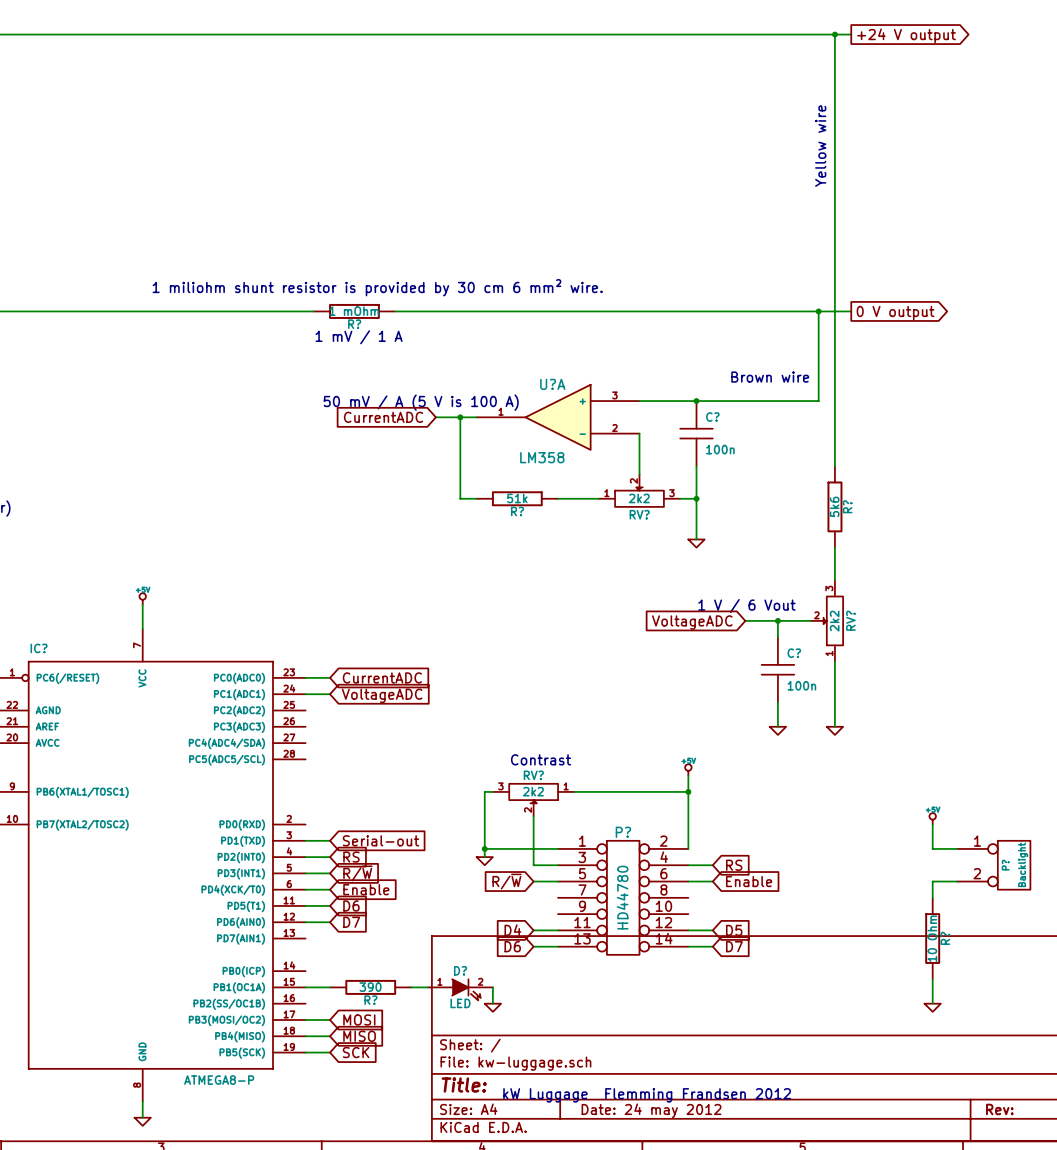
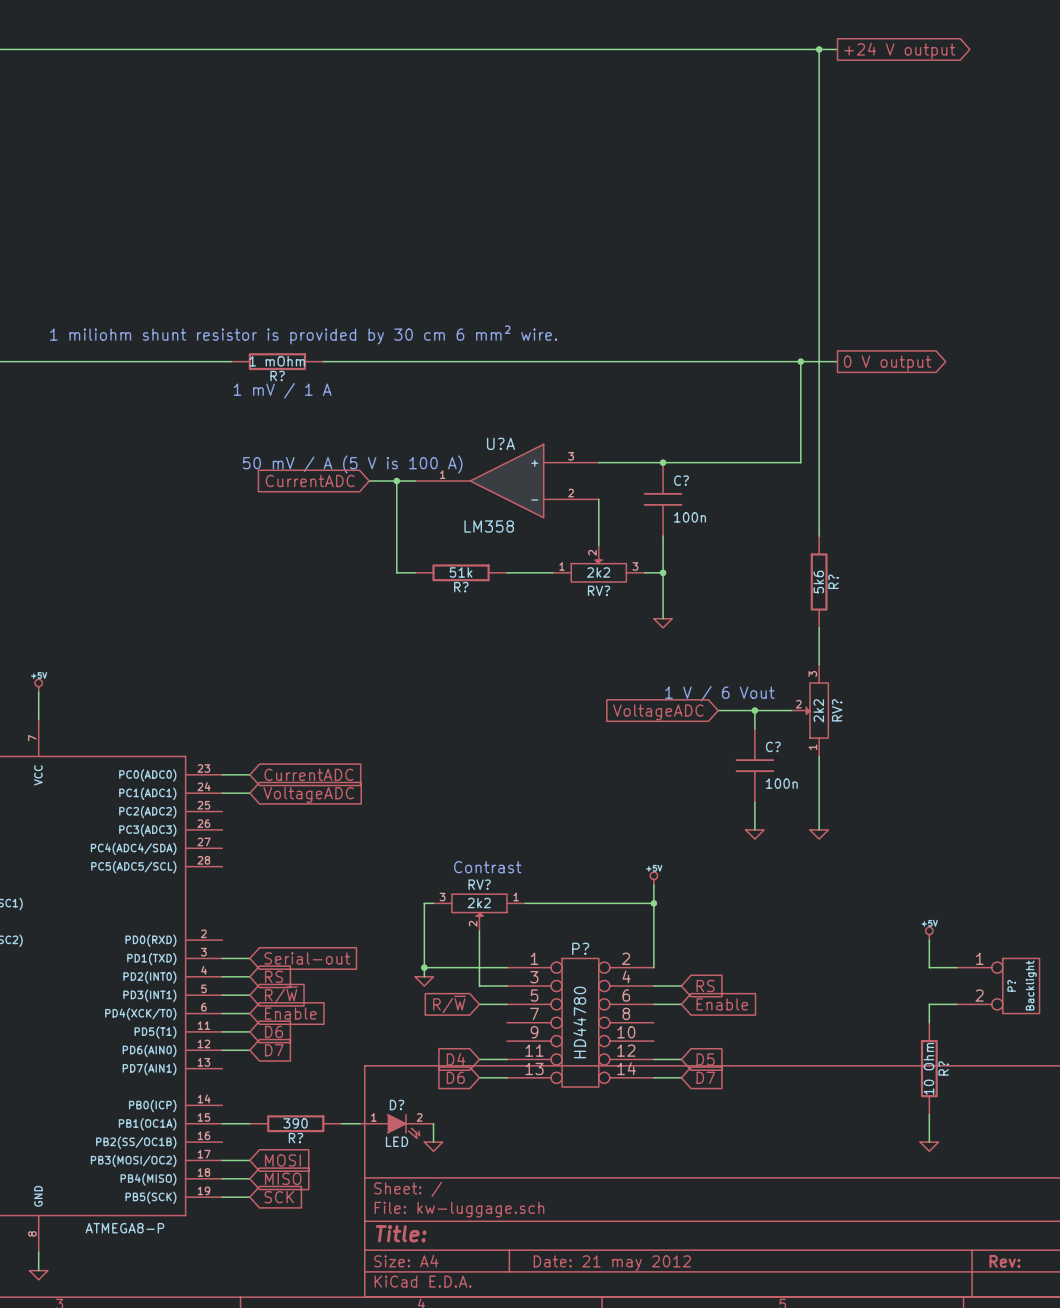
text: Yellow wire (820, 146) -> none
text: Brown wire (770, 377) -> none
text: kW Luggage Flemming Frandsen 2012 (647, 1095) -> none
title block: Date: 24 may 2012 (651, 1110) -> Date: 21 may 2012 (612, 1263)

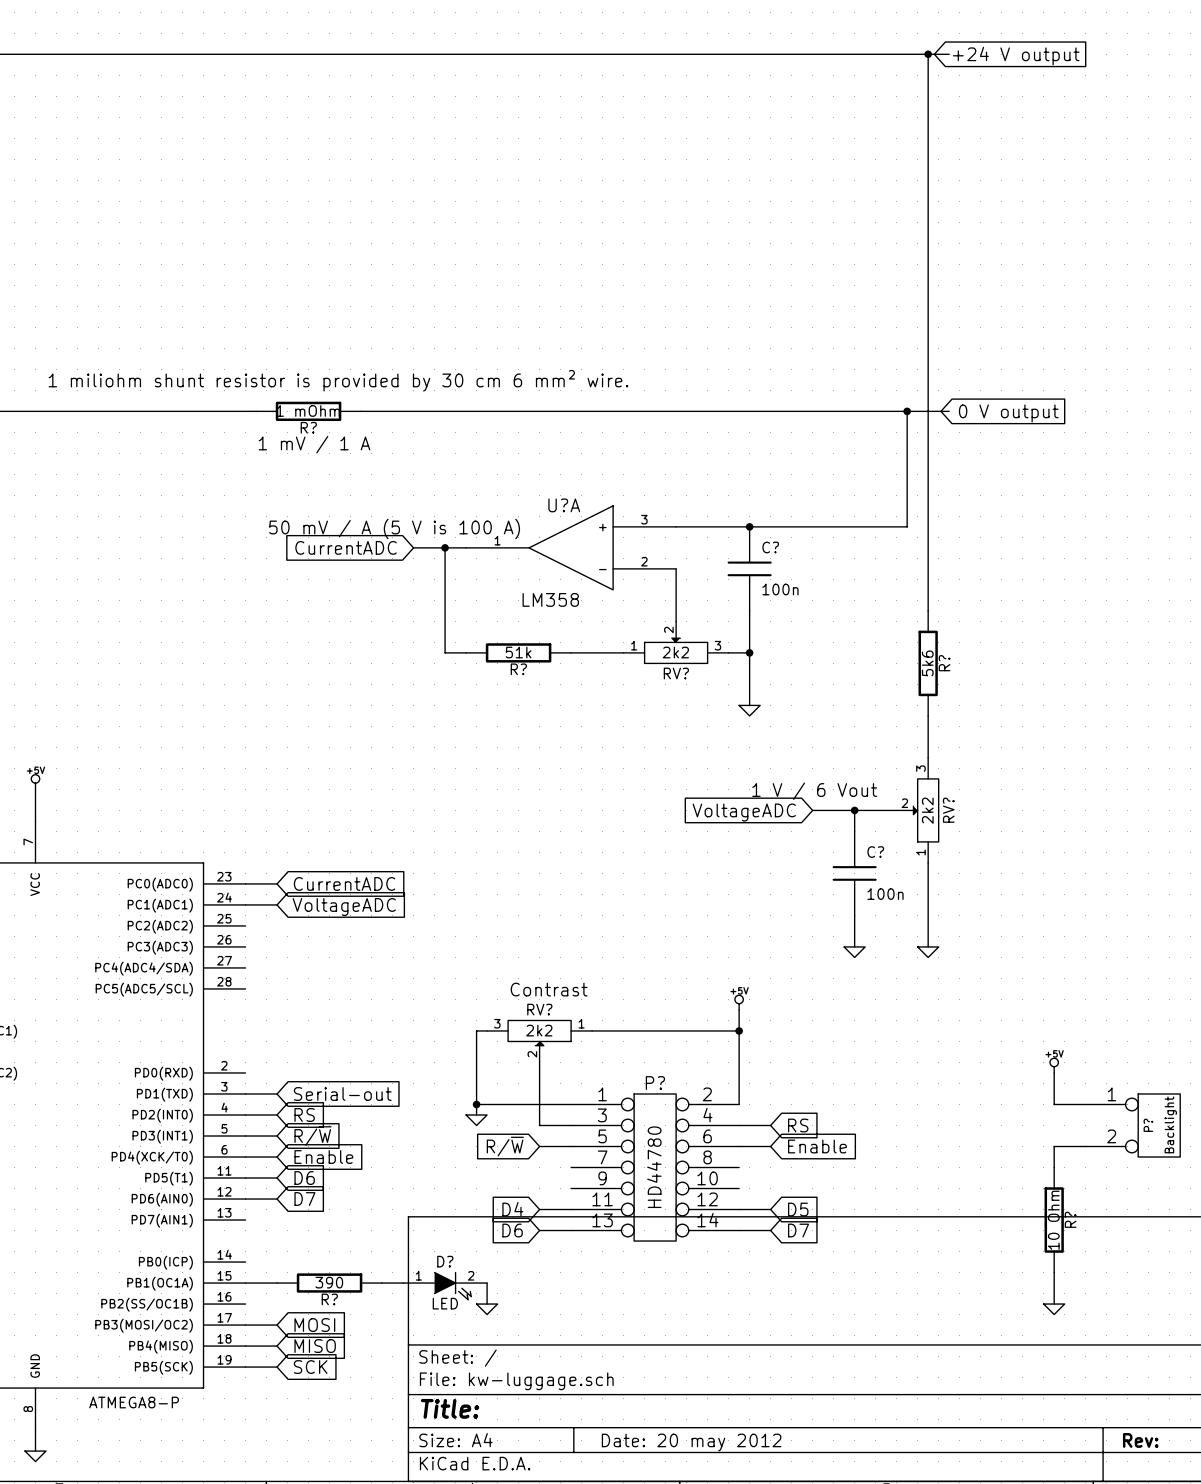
global label rotation: 0° (899, 51) -> 180° (1016, 56)
global label rotation: 0° (887, 363) -> 180° (1008, 413)
title block: Date: 21 may 2012 (612, 1263) -> Date: 20 may 2012 (691, 1442)

